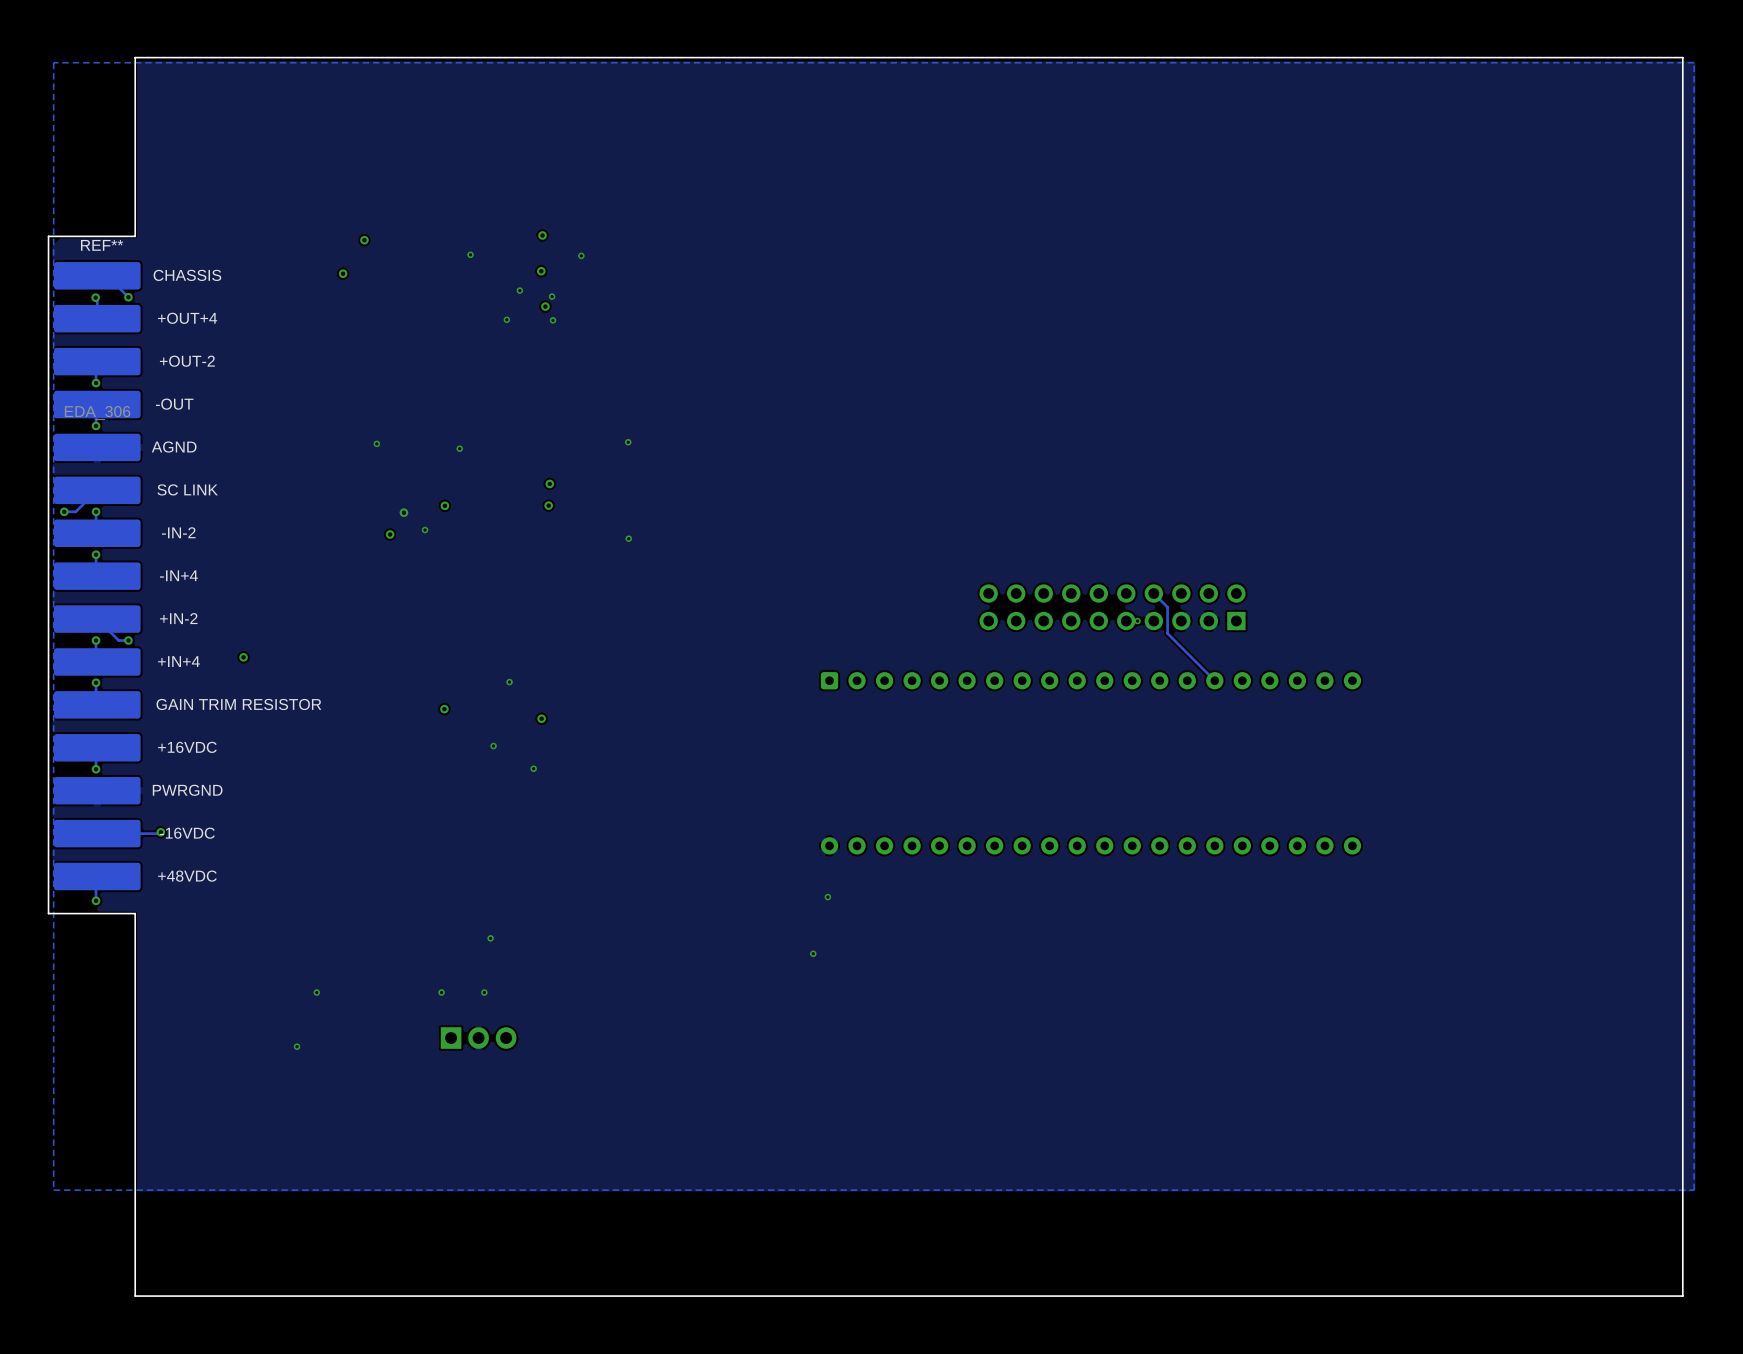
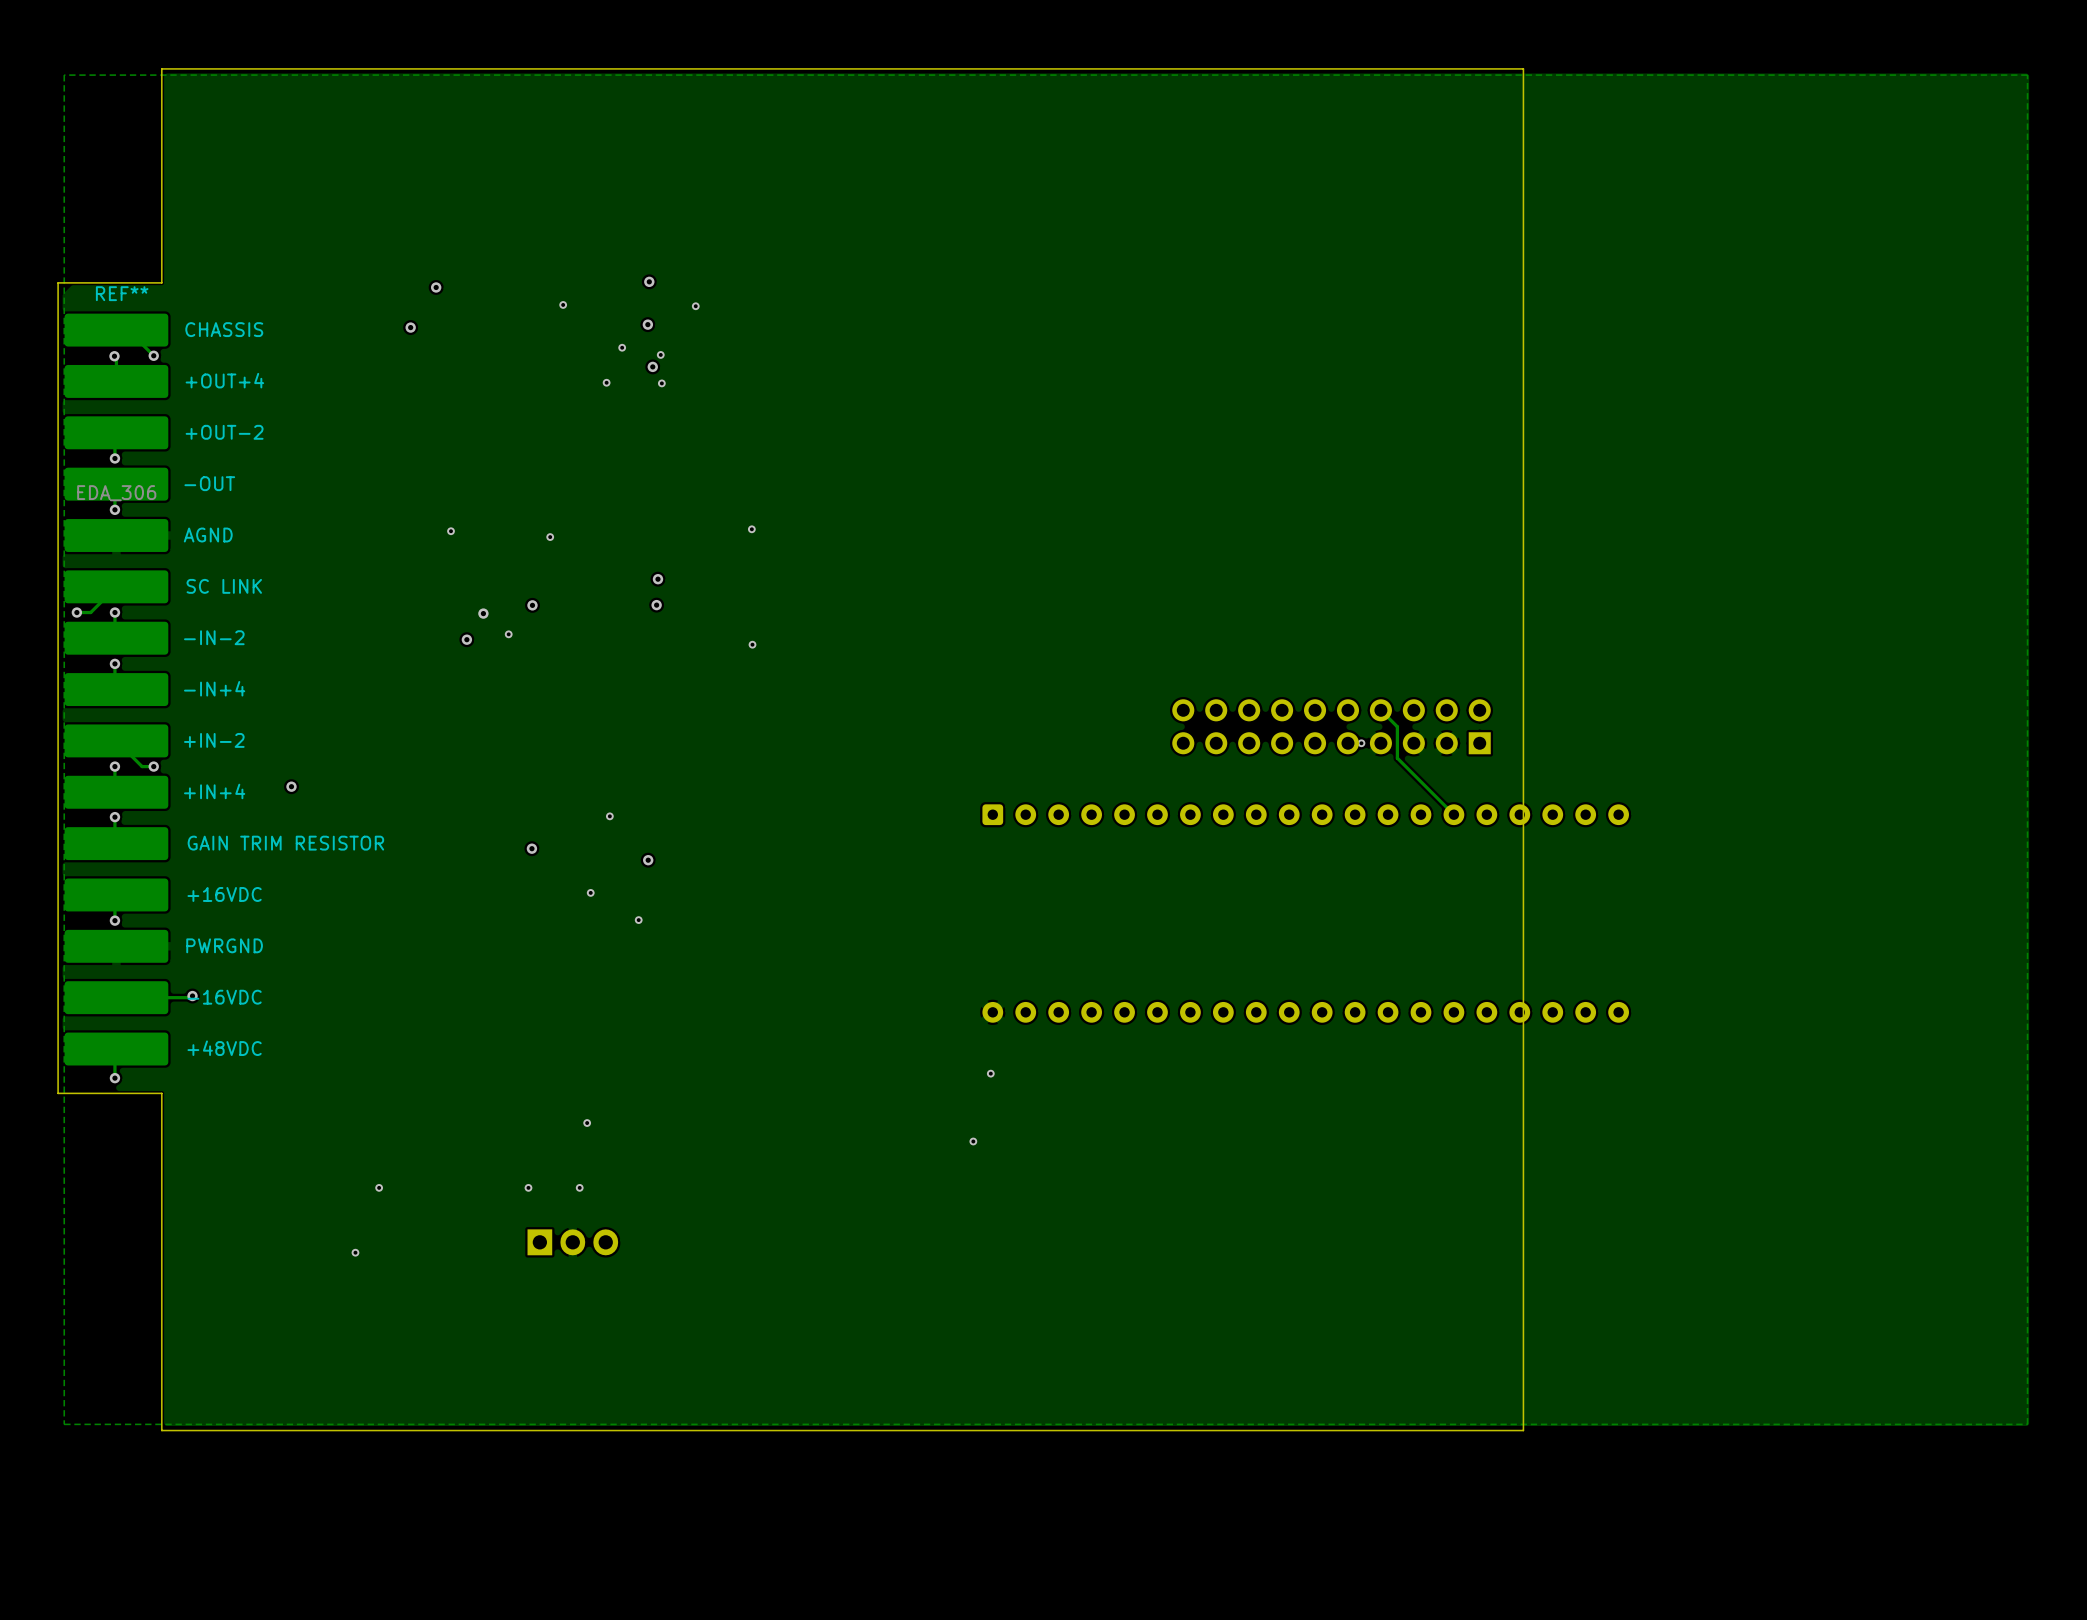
board edge: (1272, 57) (1682, 57) (1682, 1296) (135, 1296) (135, 1195) -> (1523, 68) (1523, 1430) (161, 1430)

